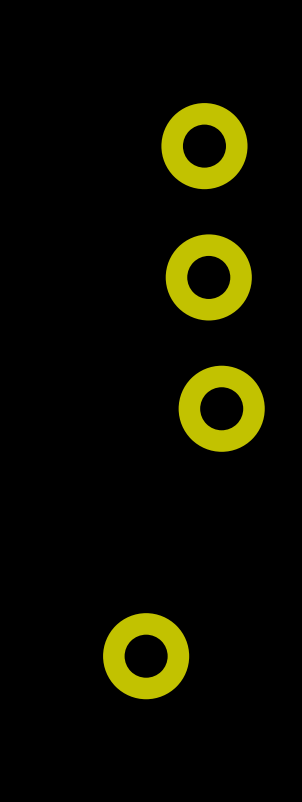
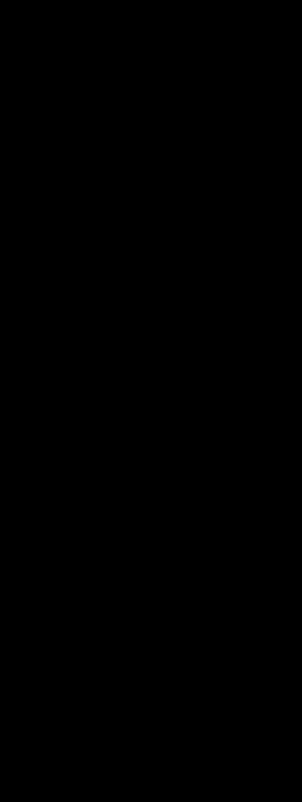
part: (204, 146) -> none
part: (208, 277) -> none
part: (221, 408) -> none
part: (146, 656) -> none

